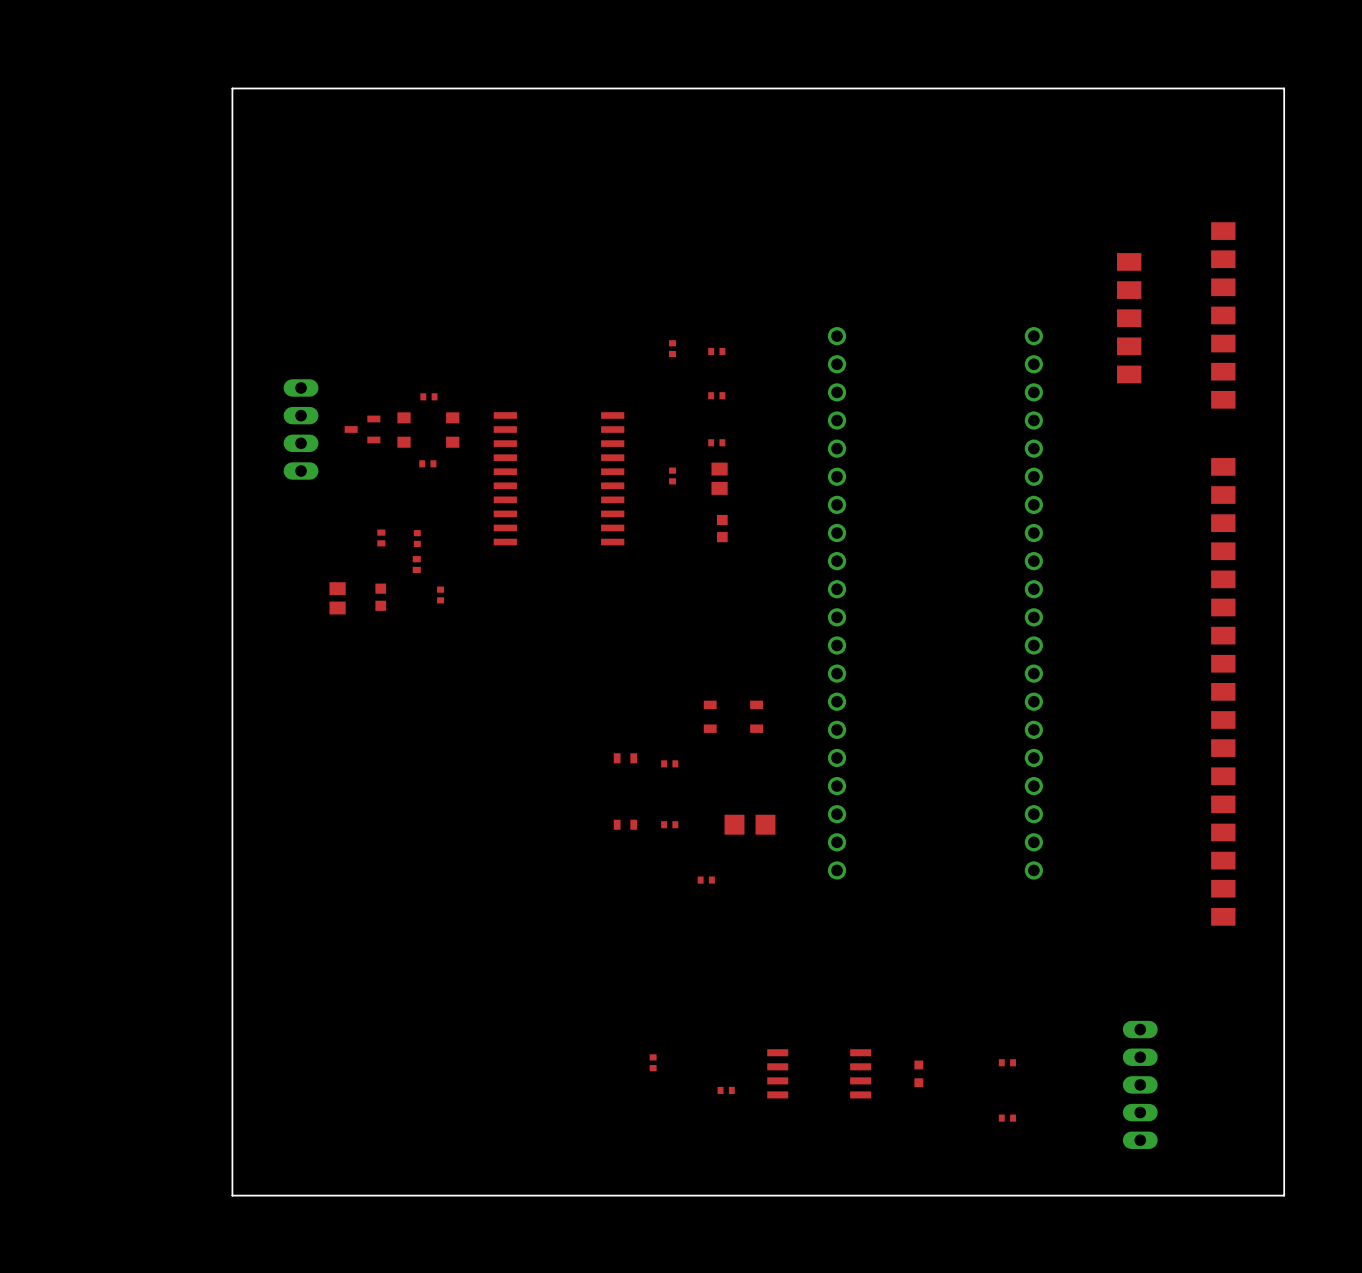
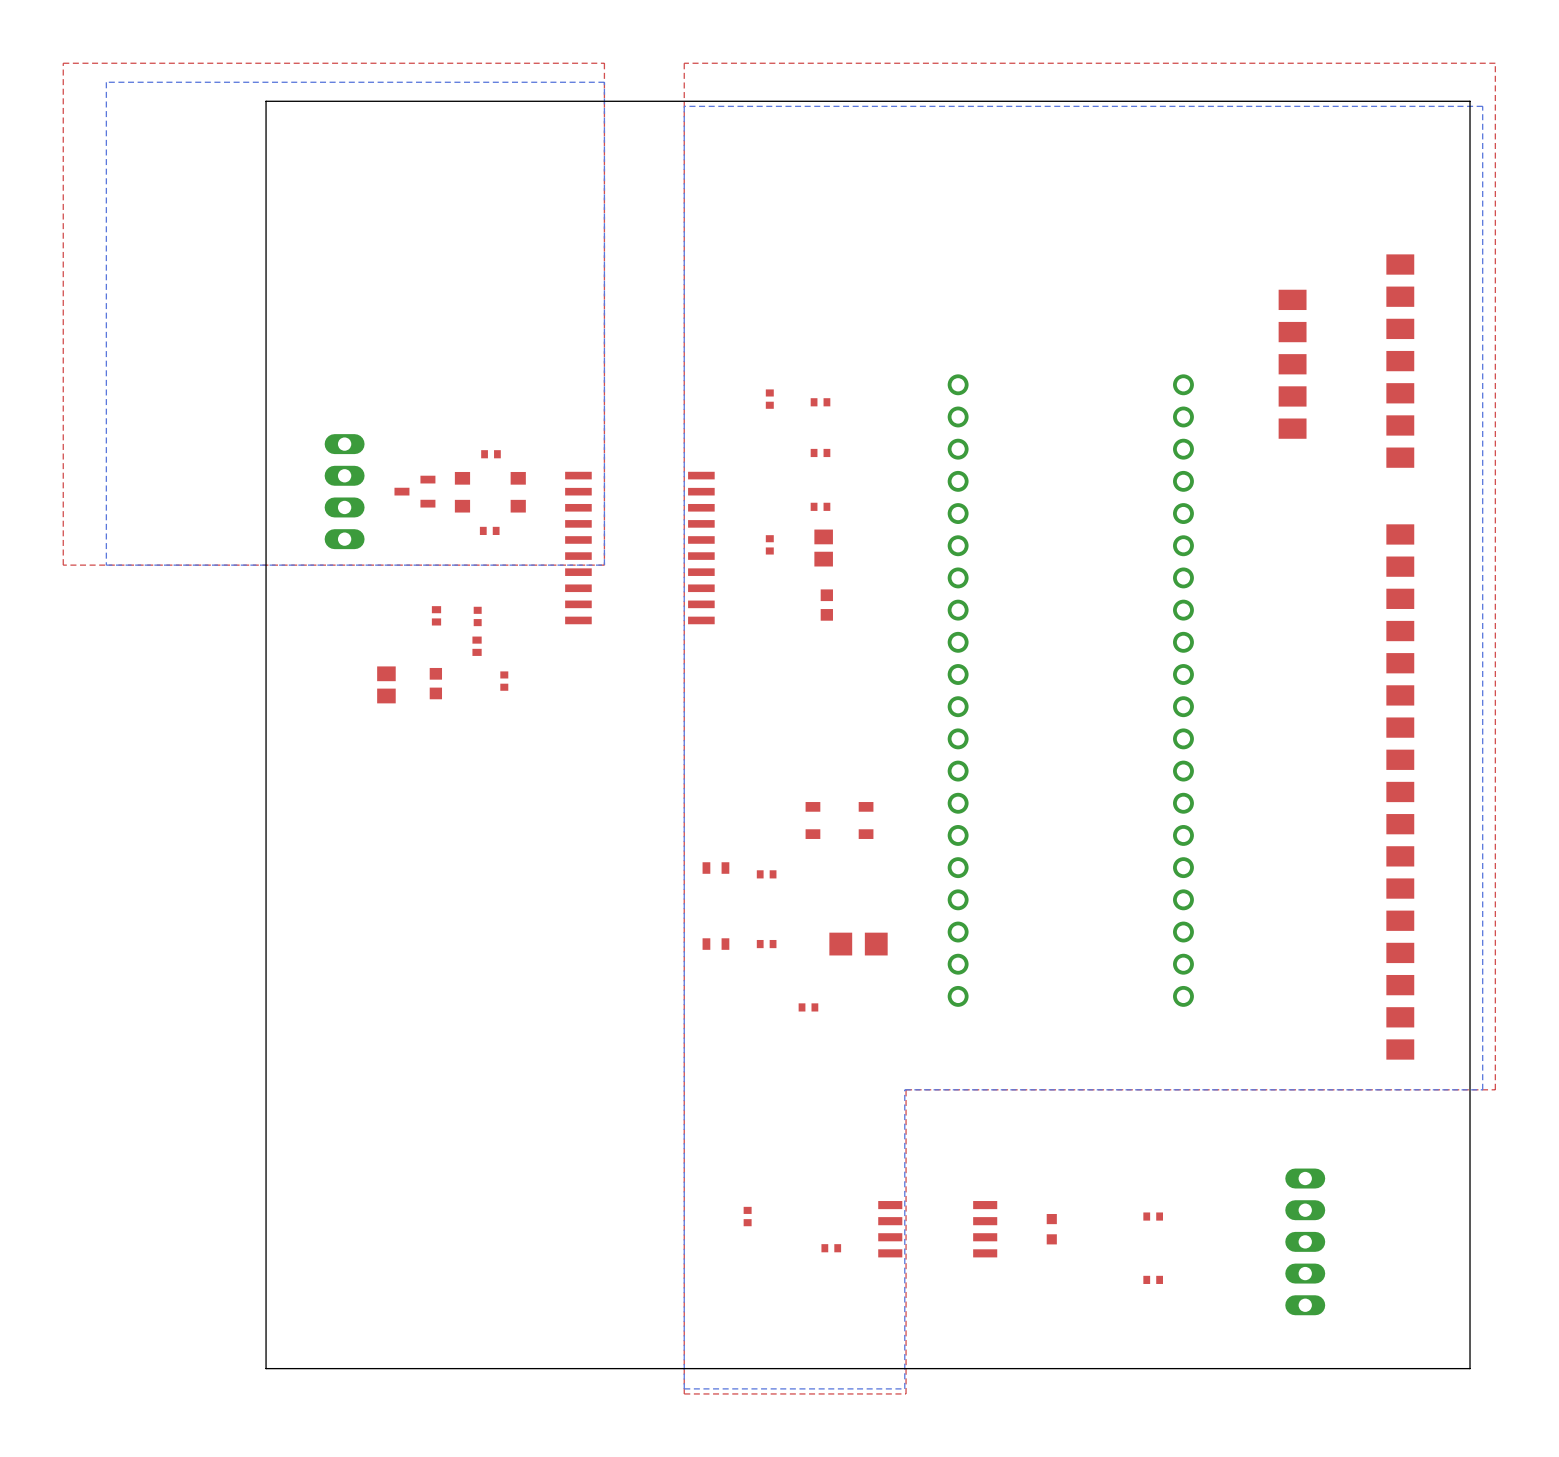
top zone outline: none -> (604, 63) (604, 565) (63, 565) (63, 63) (604, 63)
top zone outline: none -> (1495, 63) (684, 63) (684, 1393) (906, 1393) (906, 1089) (1495, 1089) (1495, 63)
bottom zone outline: none -> (604, 82) (106, 82) (106, 565) (604, 565) (604, 82)
bottom zone outline: none -> (1482, 106) (684, 106) (684, 1388) (904, 1388) (904, 1089) (1482, 1089) (1482, 106)

